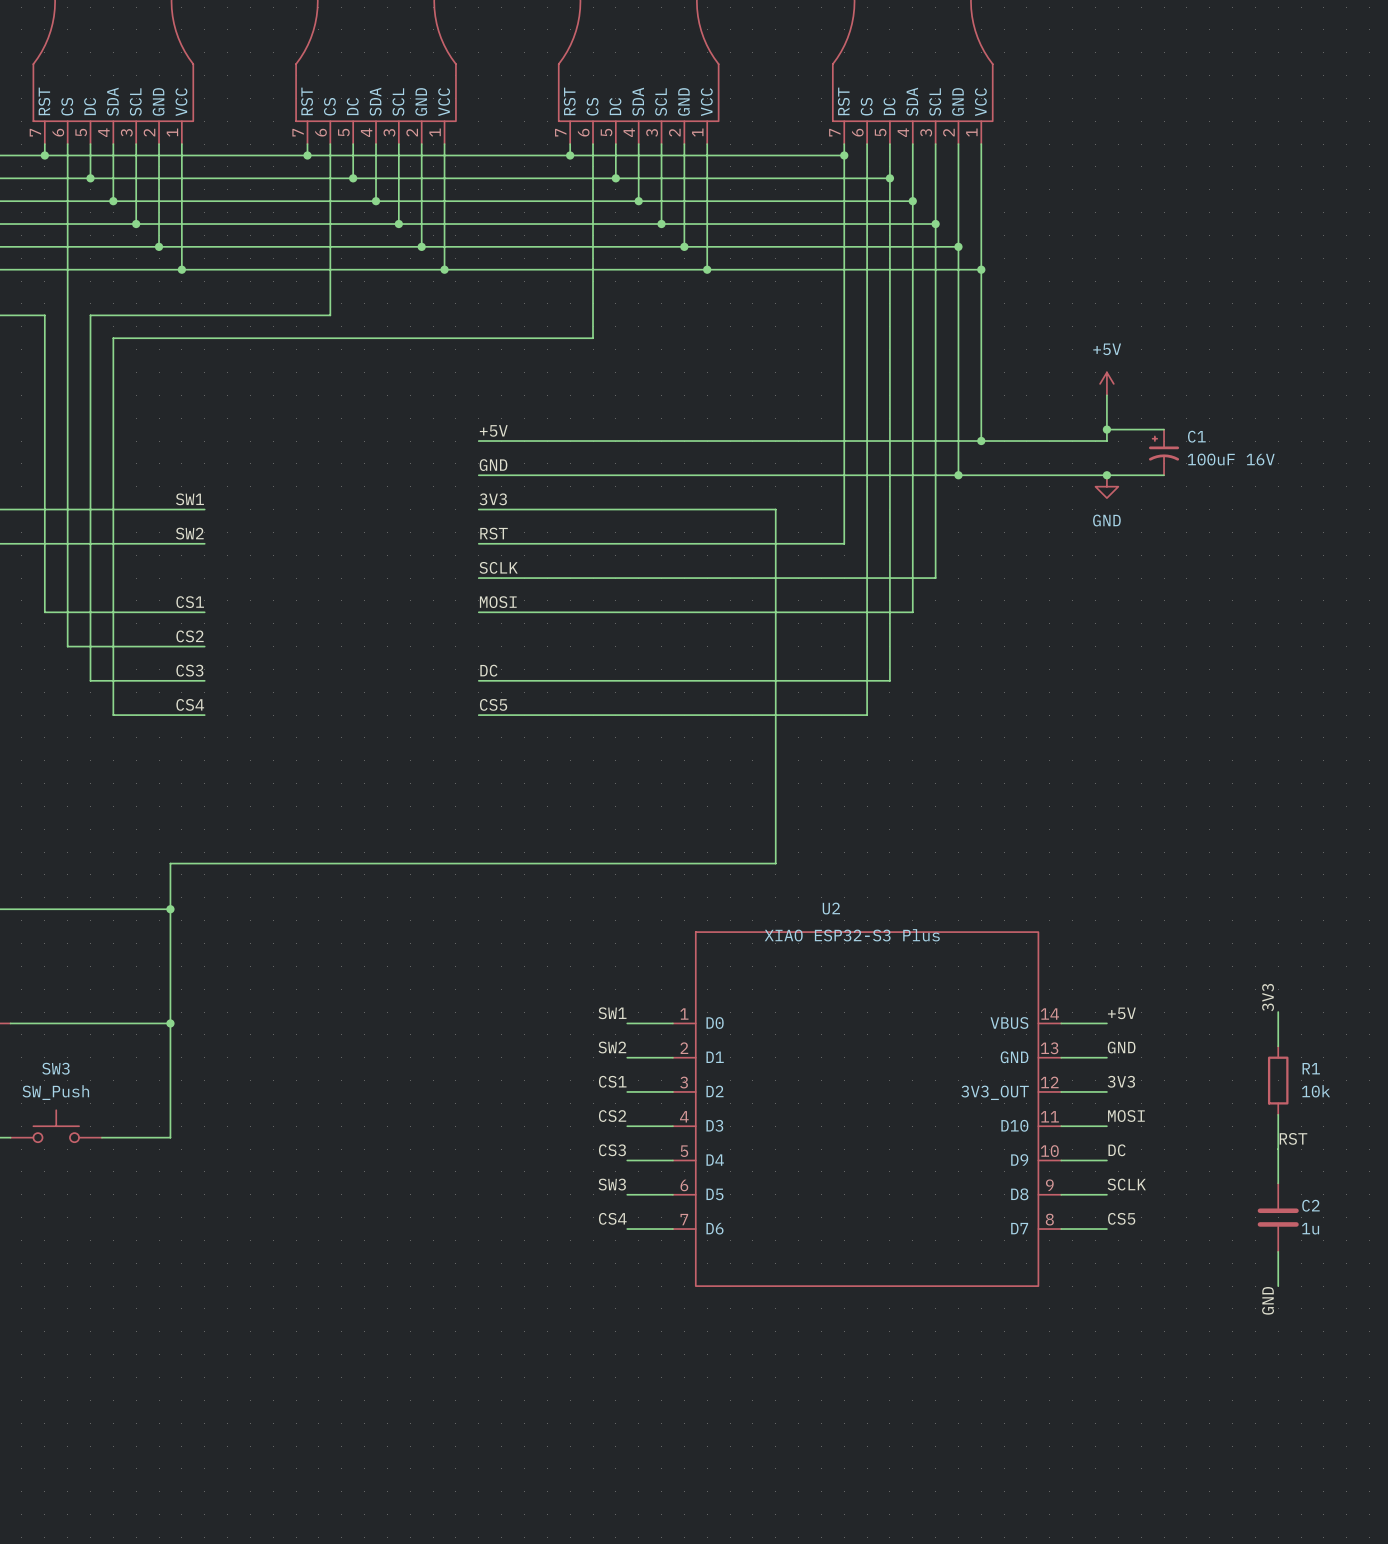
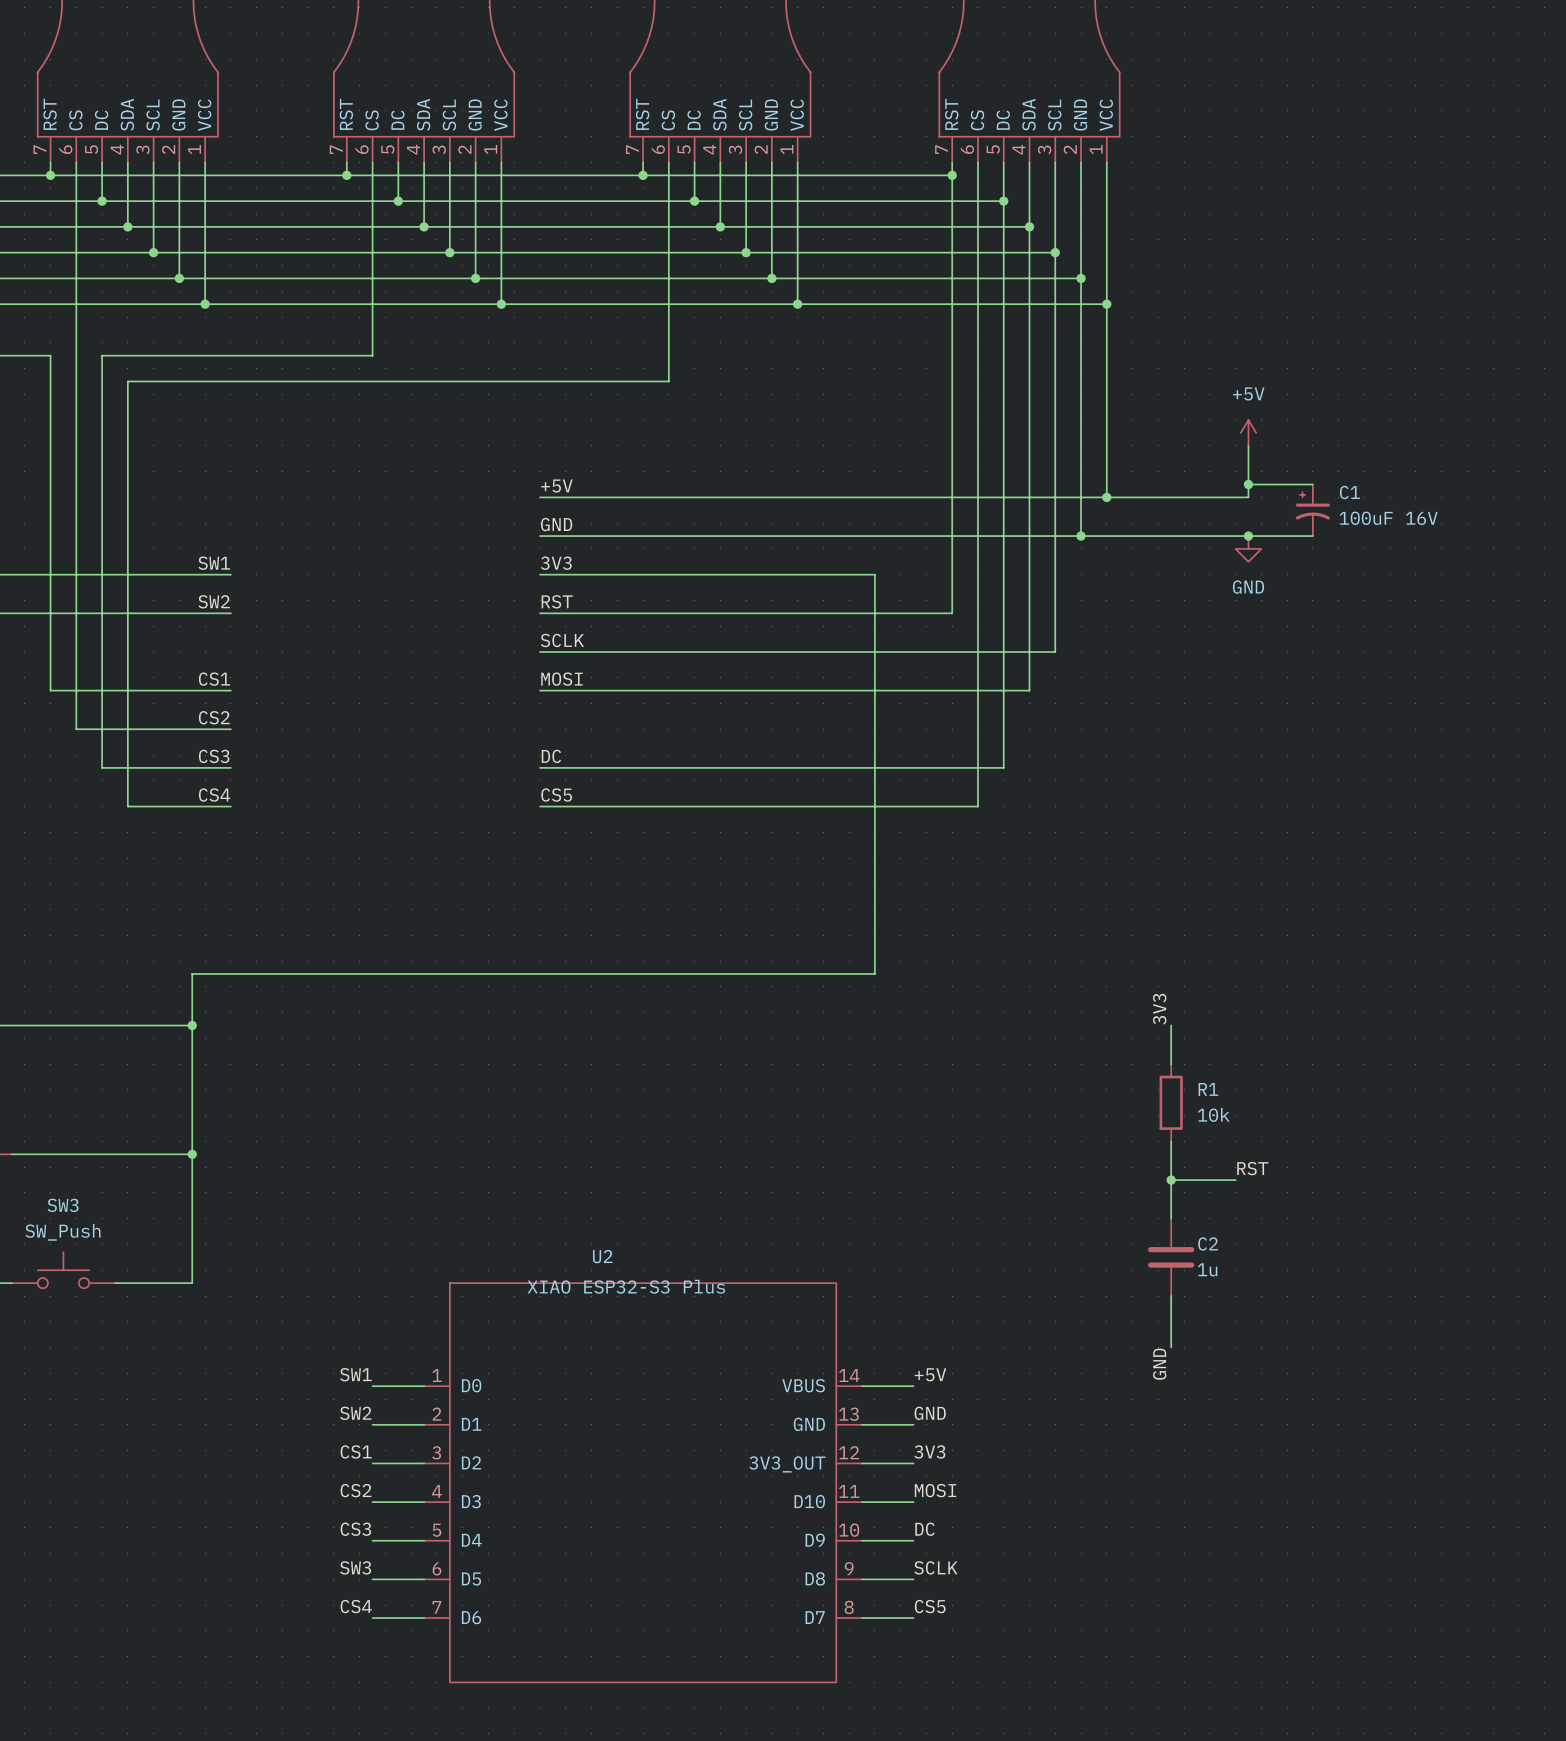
label: none -> 3V3 (1159, 1009)
wire: none -> (1171, 1025) (1171, 1064)
label: 3V3 (1268, 997) -> none
wire: (1278, 1012) (1278, 1046) -> none
label: SW1 (612, 1013) -> none
label: +5V (1121, 1013) -> none
wire: (627, 1023) (672, 1023) -> none
wire: (1061, 1023) (1106, 1023) -> none
wire: none -> (1171, 1180) (1235, 1180)
junction: none -> (1171, 1180)
label: SW2 (612, 1047) -> none
label: GND (1121, 1047) -> none
wire: (627, 1057) (672, 1057) -> (862, 1386) (913, 1386)
wire: (1061, 1057) (1106, 1057) -> none
R1 position: (1278, 1080) -> (1171, 1102)
label: CS1 (612, 1081) -> none
label: 3V3 (1121, 1081) -> none
wire: (627, 1091) (672, 1091) -> (862, 1424) (913, 1424)
wire: (1061, 1091) (1106, 1091) -> none
U2 position: (867, 1109) -> (643, 1482)
wire: (1278, 1114) (1278, 1183) -> none
label: CS2 (612, 1116) -> none
label: MOSI (1126, 1116) -> none
wire: (627, 1126) (672, 1126) -> (862, 1463) (913, 1463)
wire: (1061, 1126) (1106, 1126) -> none
label position: RST (1293, 1138) -> RST (1252, 1168)
label: CS3 (612, 1150) -> none
label: DC (1117, 1150) -> none
wire: (627, 1160) (672, 1160) -> (862, 1502) (913, 1502)
wire: (1061, 1160) (1106, 1160) -> none
label: SW3 (612, 1184) -> none
label: SCLK (1126, 1184) -> none
wire: (627, 1194) (672, 1194) -> (862, 1540) (913, 1540)
wire: (1061, 1194) (1106, 1194) -> none
label: none -> GND (1159, 1364)
C2 position: (1278, 1217) -> (1171, 1257)
label: none -> SW1 (355, 1374)
label: CS4 (612, 1218) -> none
label: none -> +5V (930, 1374)
label: CS5 (1121, 1218) -> none
wire: none -> (372, 1386) (424, 1386)
wire: (627, 1229) (672, 1229) -> (862, 1579) (913, 1579)
wire: (1061, 1229) (1106, 1229) -> none
wire: (1278, 1251) (1278, 1286) -> none
label: none -> SW2 (355, 1413)
label: none -> GND (930, 1413)
wire: none -> (372, 1424) (424, 1424)
label: none -> CS1 (356, 1451)
label: none -> 3V3 (929, 1451)
wire: none -> (372, 1463) (424, 1463)
label: GND (1268, 1300) -> none
label: none -> CS2 (356, 1490)
label: none -> MOSI (935, 1490)
wire: none -> (372, 1502) (424, 1502)
label: none -> CS3 (355, 1529)
label: none -> DC (924, 1529)
wire: none -> (372, 1540) (424, 1540)
label: none -> SW3 (355, 1567)
label: none -> SCLK (935, 1567)
wire: none -> (372, 1579) (424, 1579)
label: none -> CS4 (356, 1606)
label: none -> CS5 (930, 1606)
wire: none -> (372, 1618) (424, 1618)
wire: none -> (862, 1618) (913, 1618)

